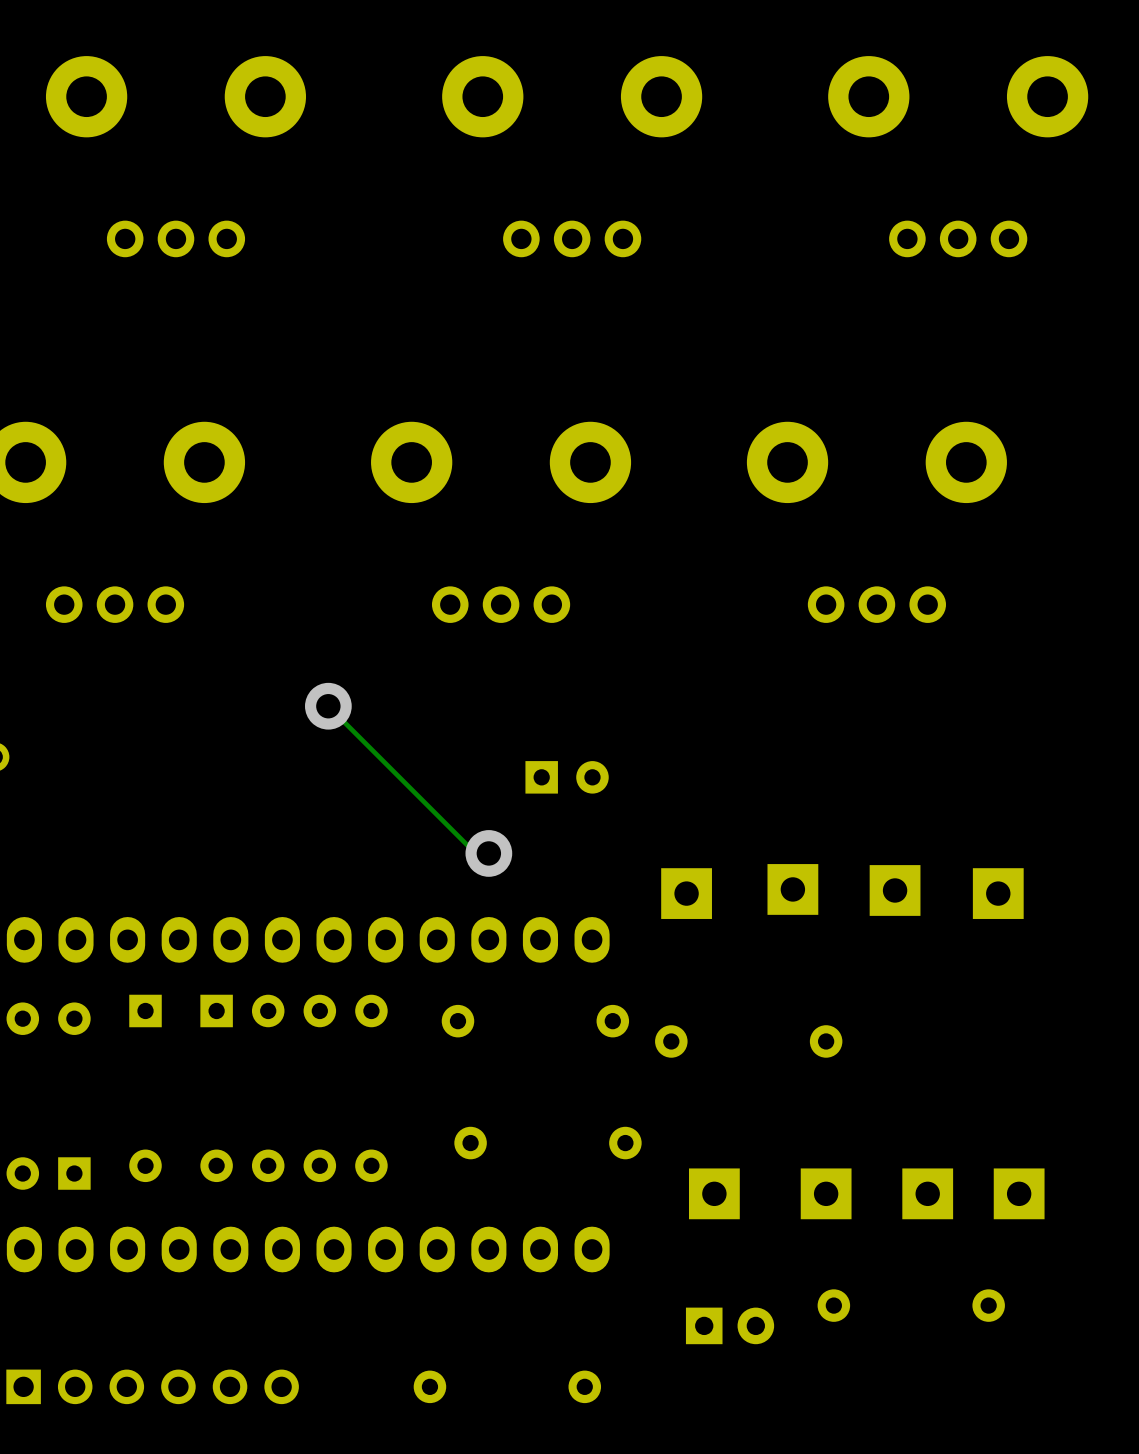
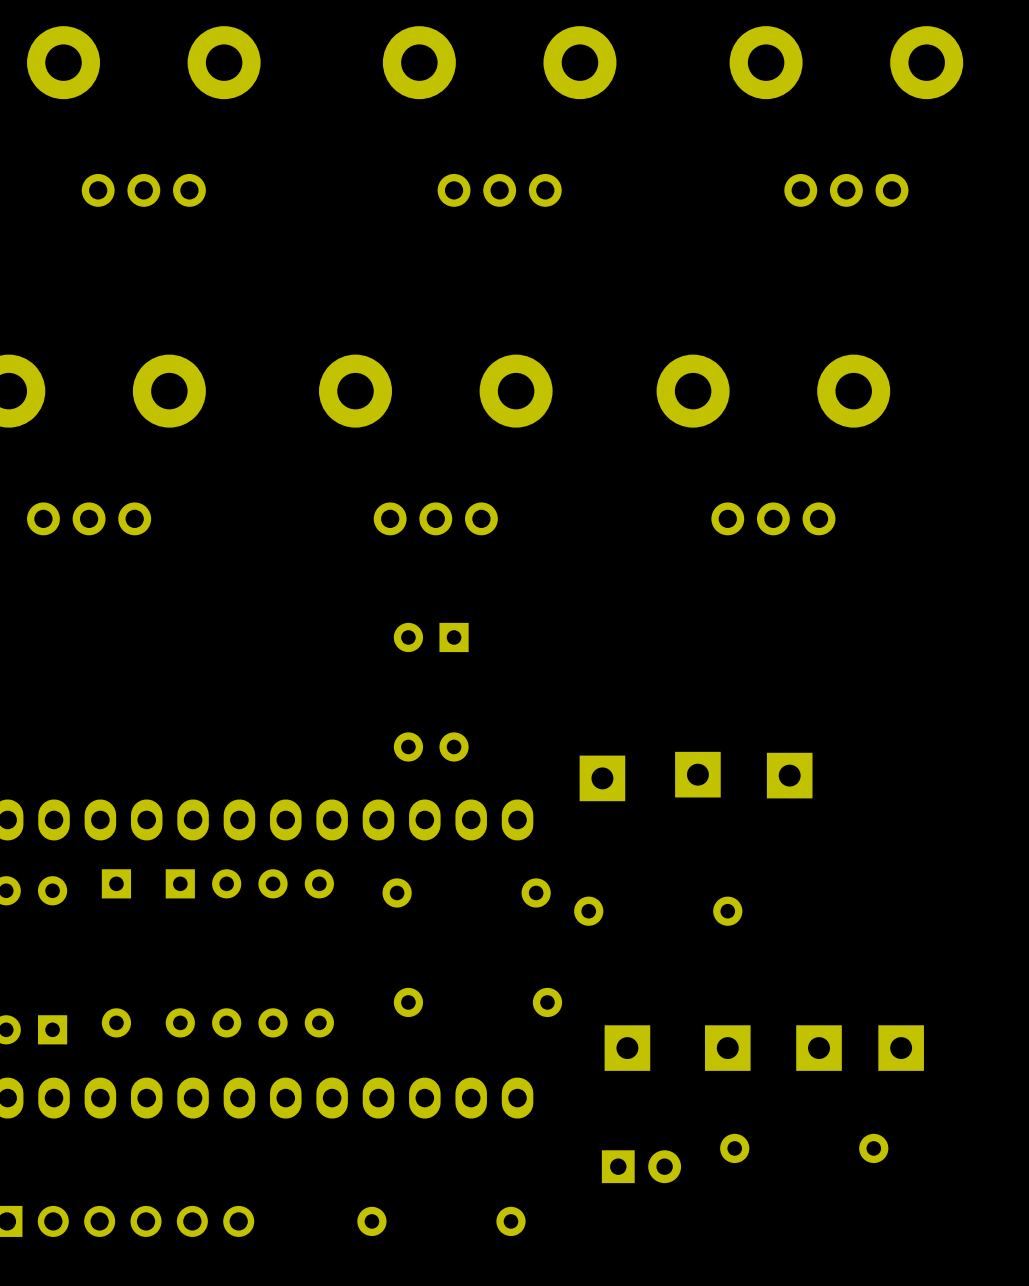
track: (328, 706) (475, 853) (488, 853) -> none
via: (328, 706) -> none
part rotation: 0° (567, 777) -> 180° (431, 637)
part position: (567, 777) -> (431, 637)
via: (488, 853) -> none
part: none -> (431, 746)
part: (998, 893) -> none

